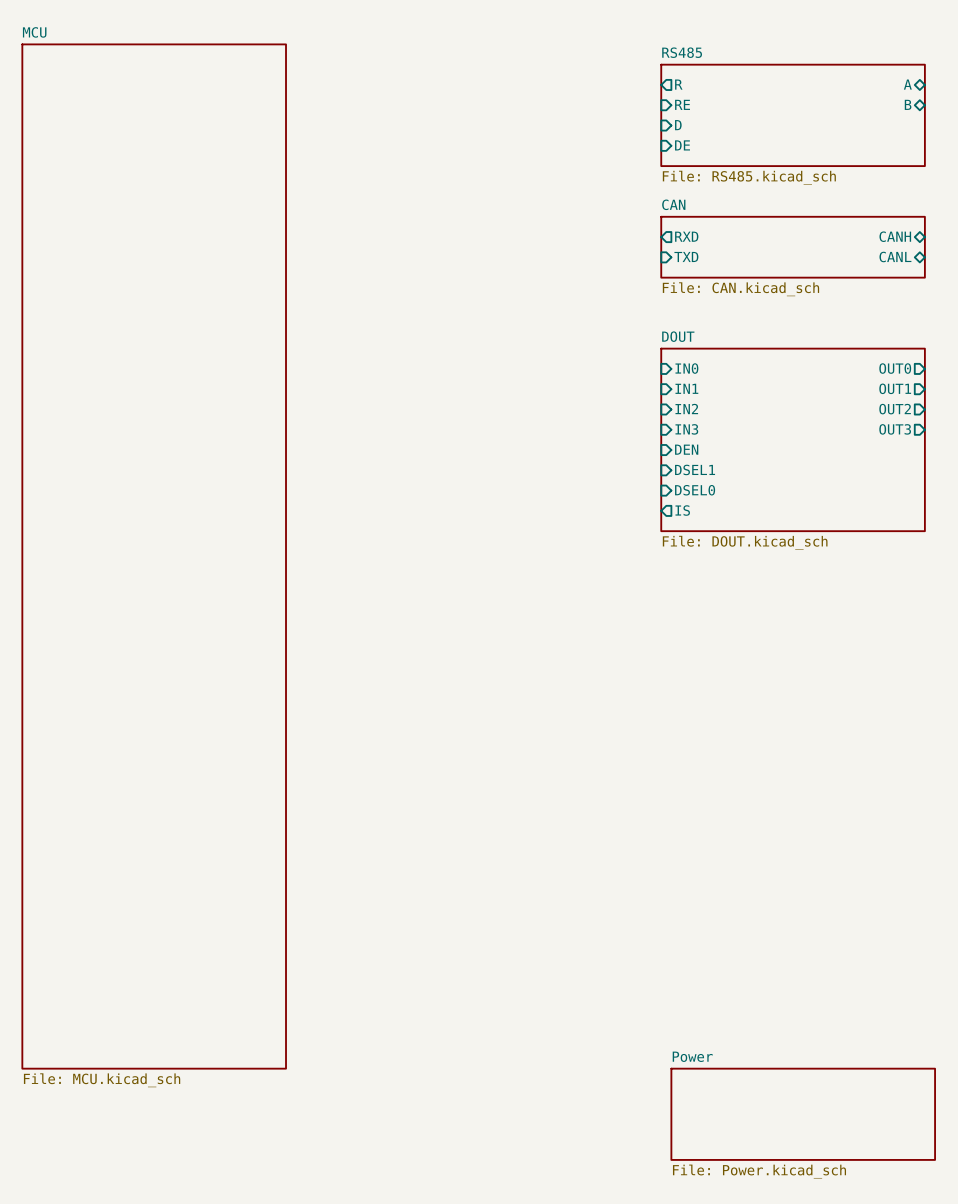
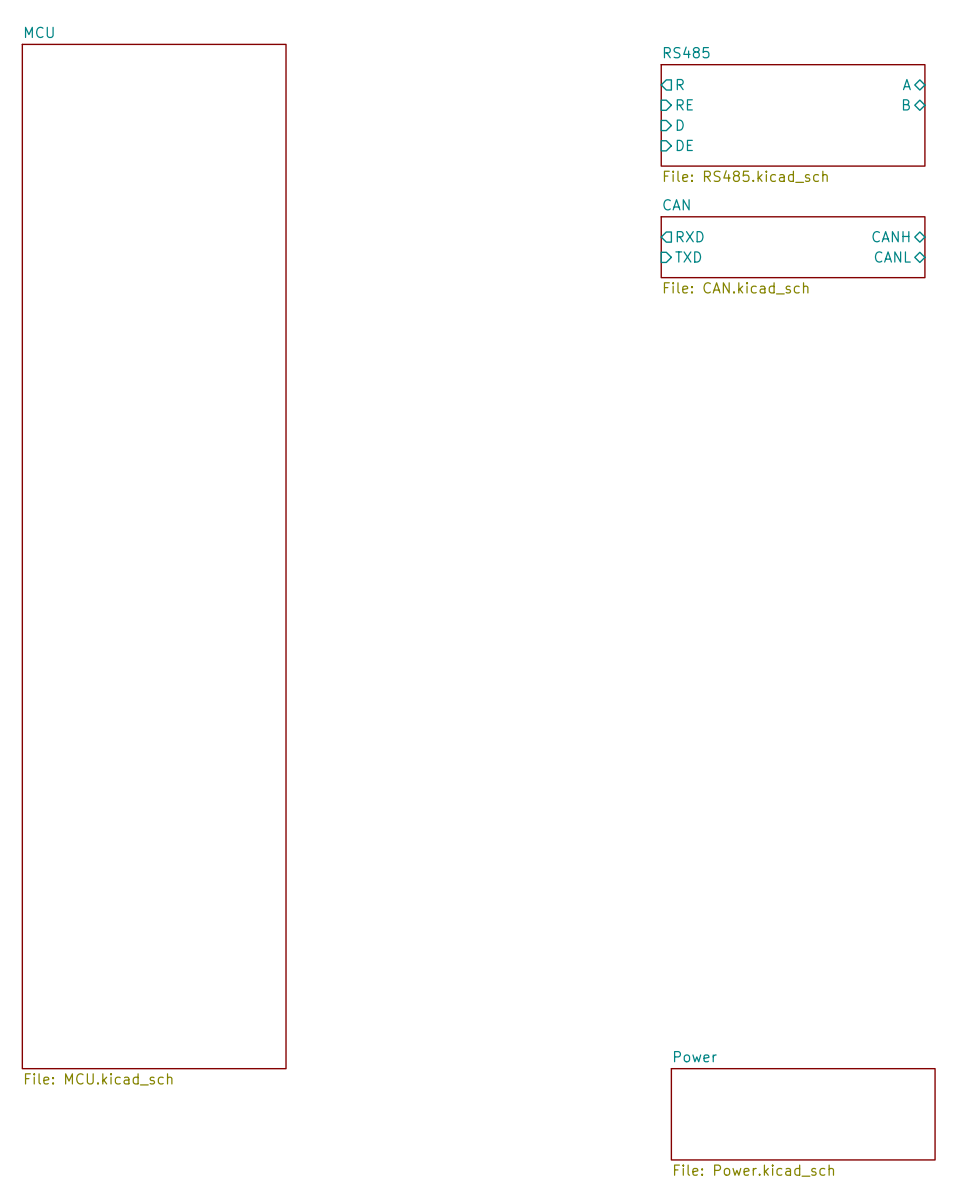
sheet pin: IN0 (686, 368) -> none
sheet pin: OUT0 (895, 368) -> none
sheet pin: IN1 (686, 388) -> none
sheet pin: OUT1 (895, 388) -> none
sheet pin: IN2 (686, 409) -> none
sheet pin: OUT2 (895, 409) -> none
sheet pin: IN3 (686, 429) -> none
sheet pin: OUT3 (895, 429) -> none
sheet DOUT: File: DOUT.kicad_sch (793, 439) -> none
sheet pin: DEN (686, 449) -> none
sheet pin: DSEL1 (695, 469) -> none
sheet pin: DSEL0 (695, 490) -> none
sheet pin: IS (682, 510) -> none

